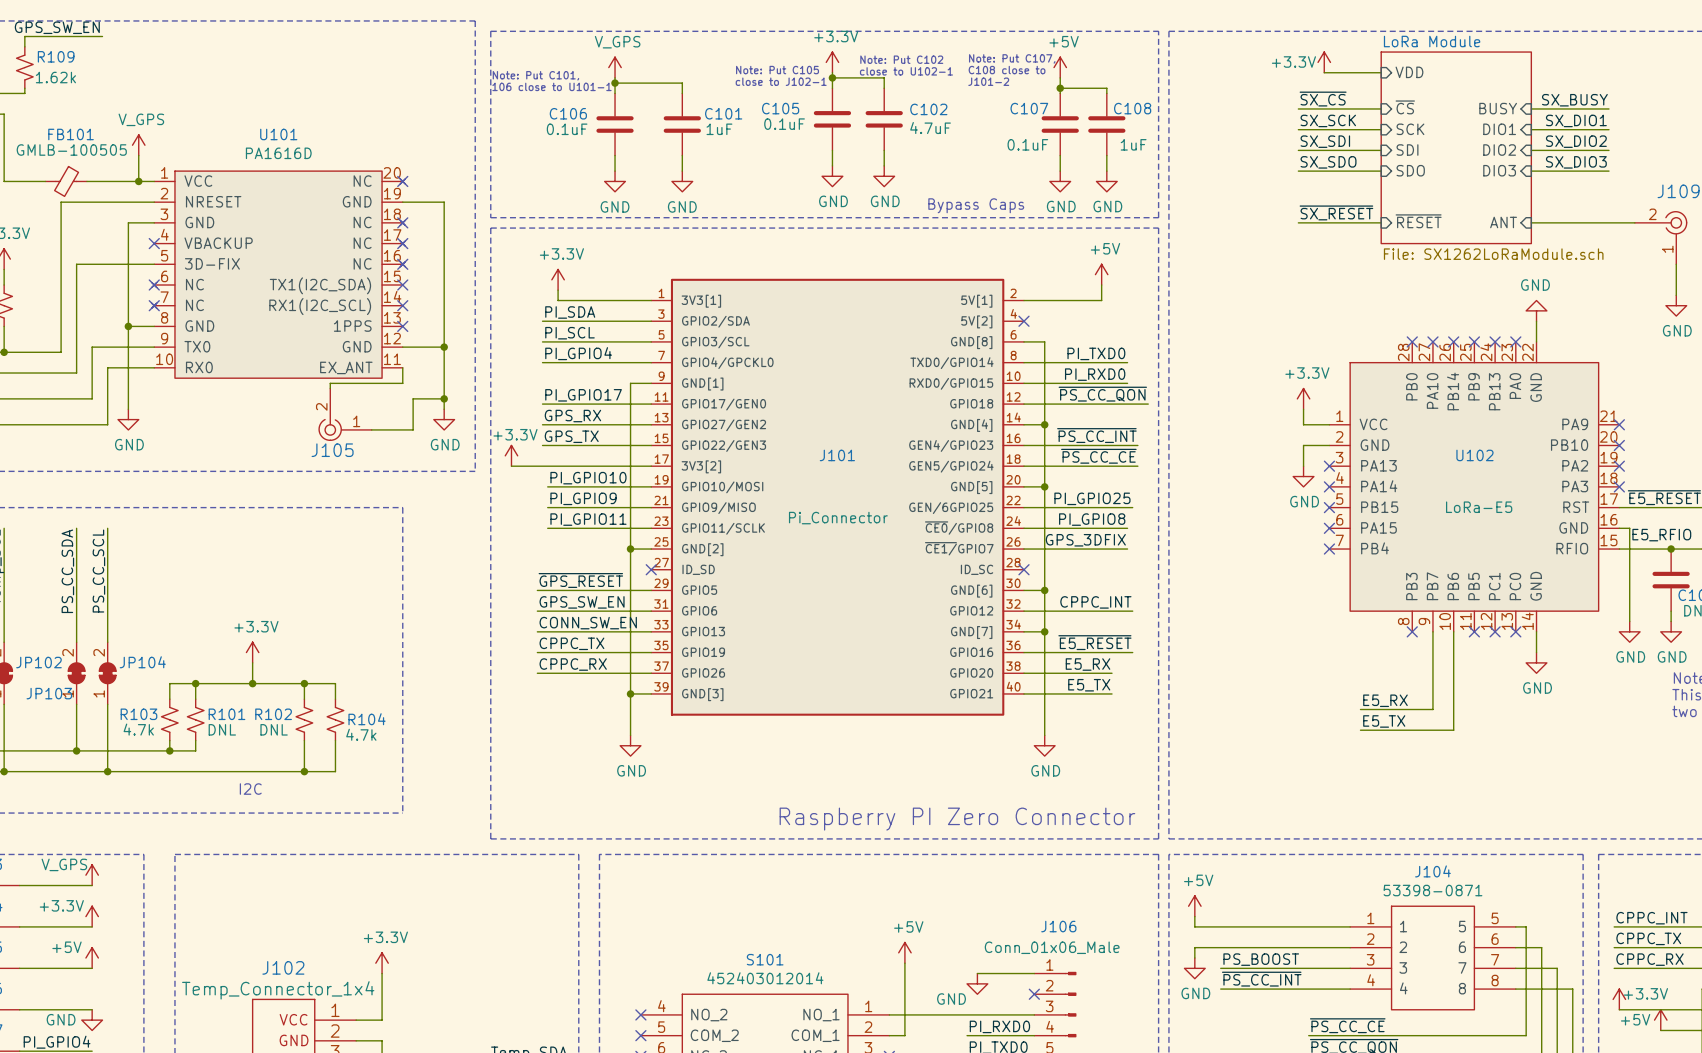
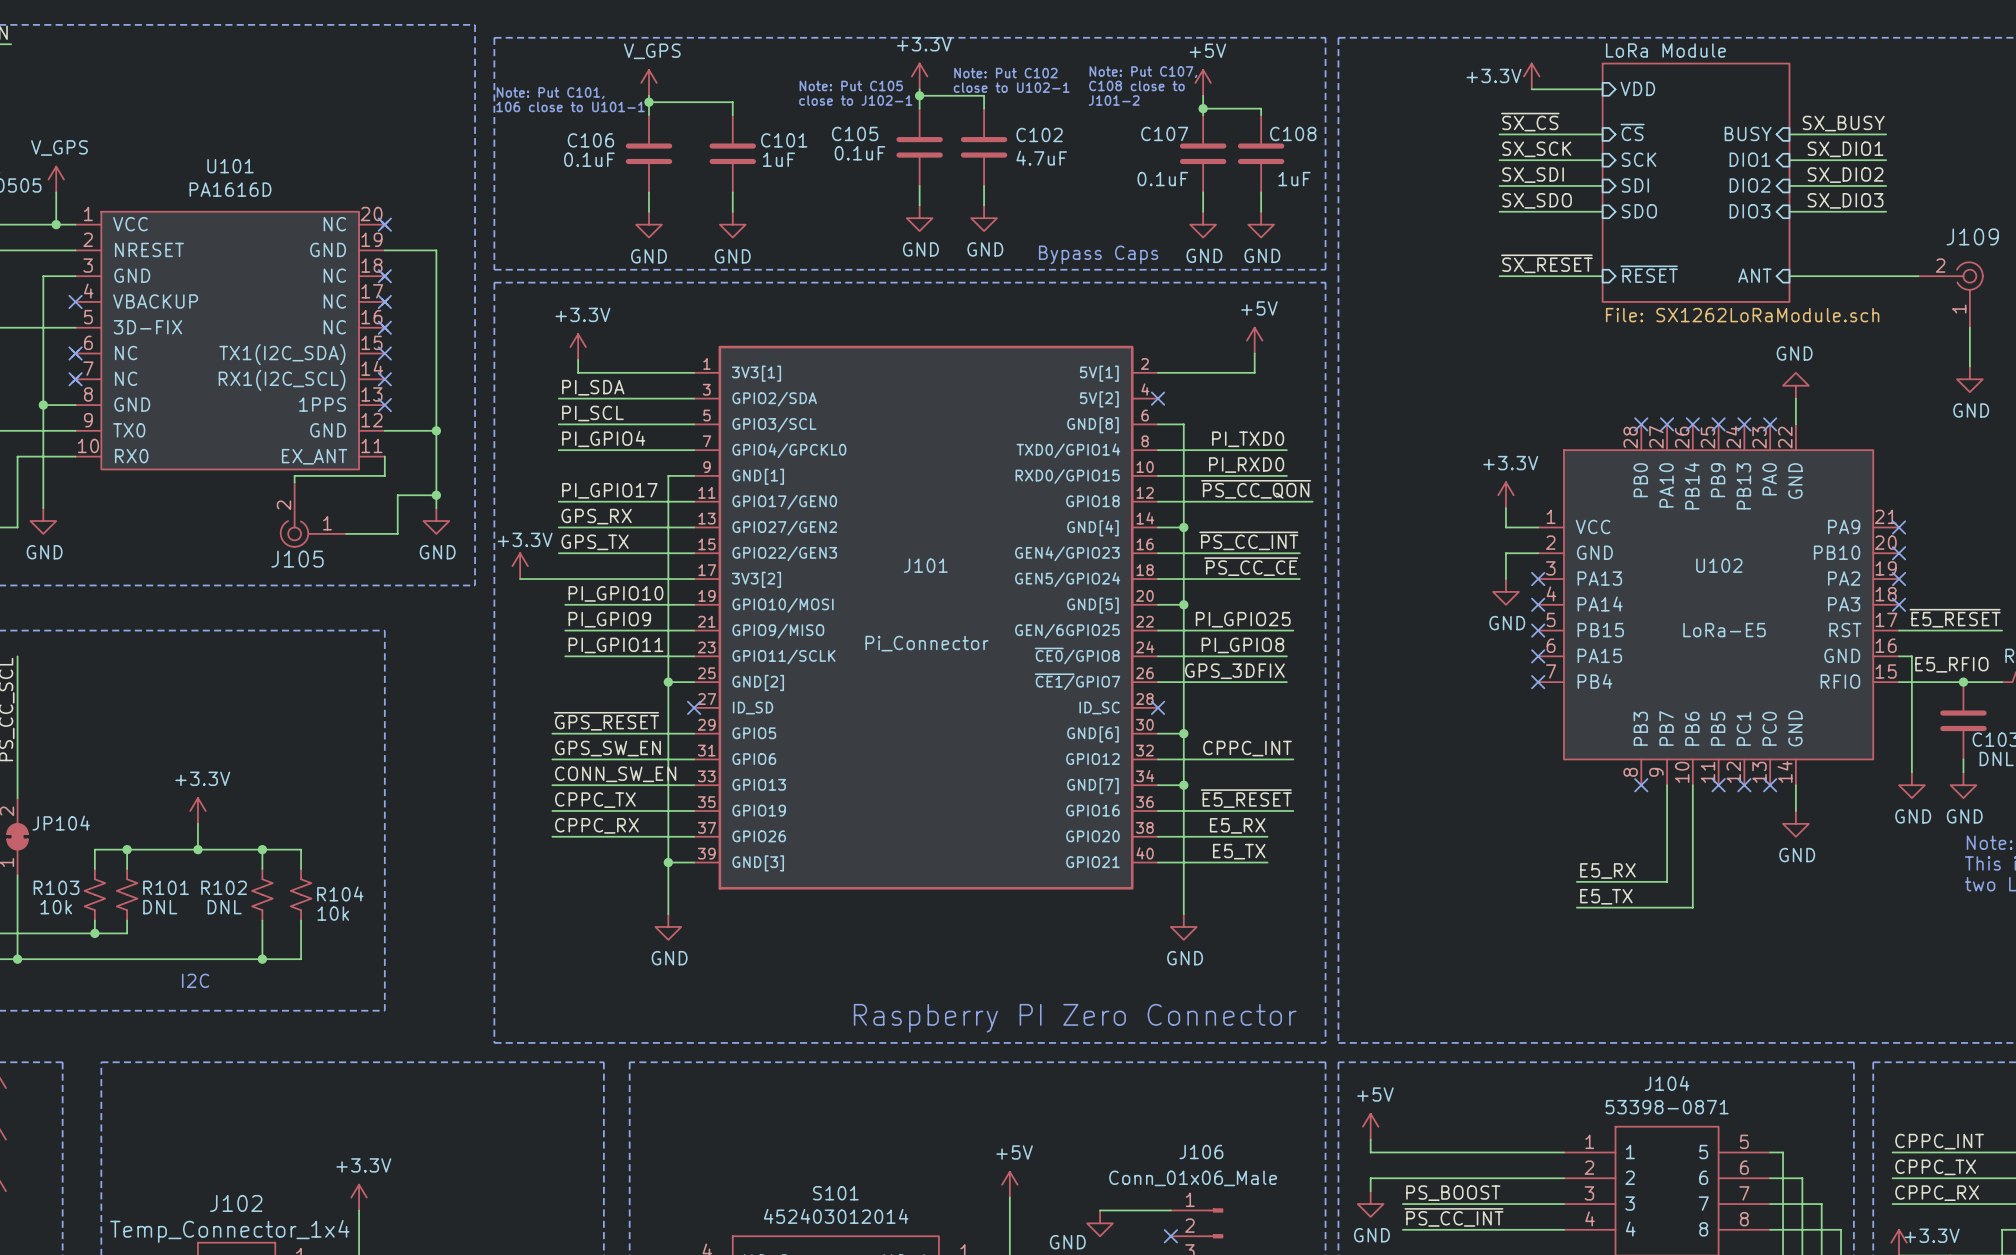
R103 value: 4.7k (138, 729) -> 10k (56, 907)
R104 value: 4.7k (361, 734) -> 10k (333, 913)

